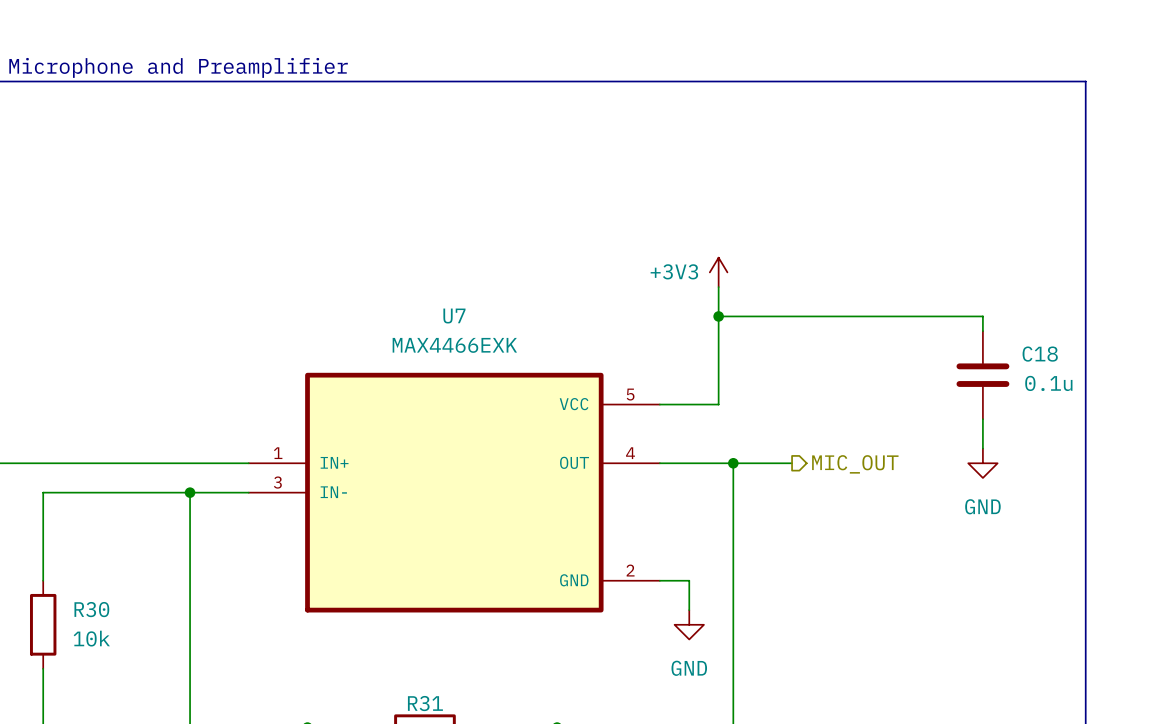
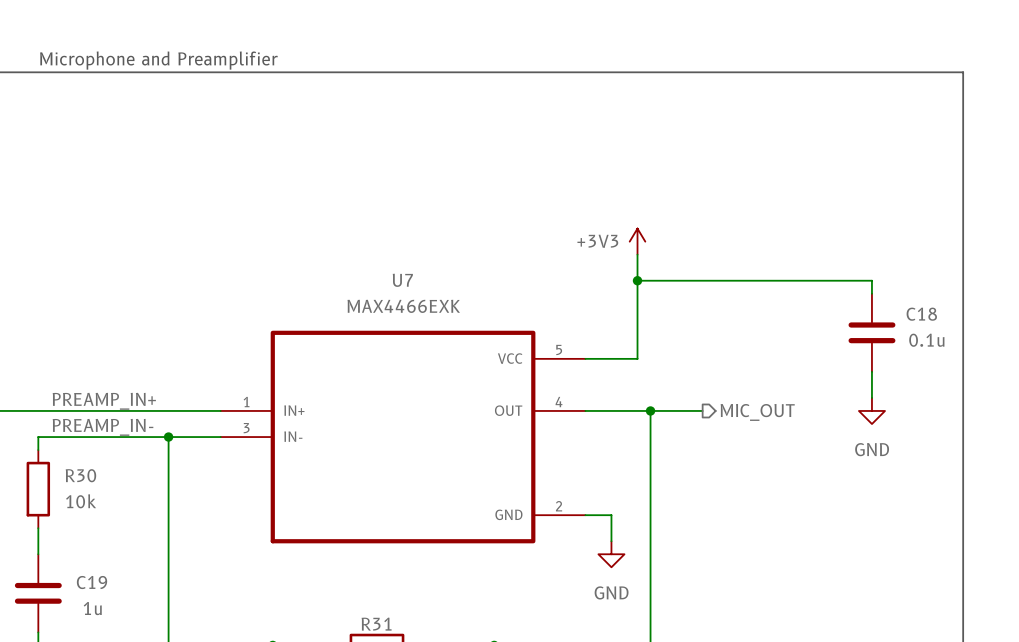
label: none -> PREAMP_IN+ (104, 401)
label: none -> PREAMP_IN- (103, 427)
wire: (43, 507) (43, 580) -> none
wire: none -> (38, 528) (38, 554)
R30 position: (43, 624) -> (38, 489)
C19: none -> 1u (38, 593)

